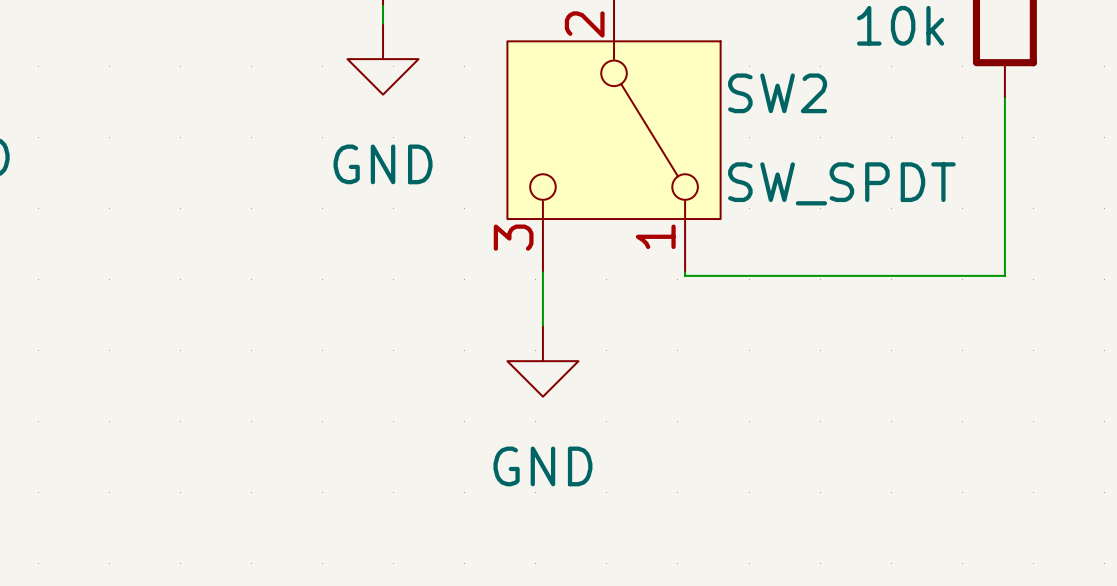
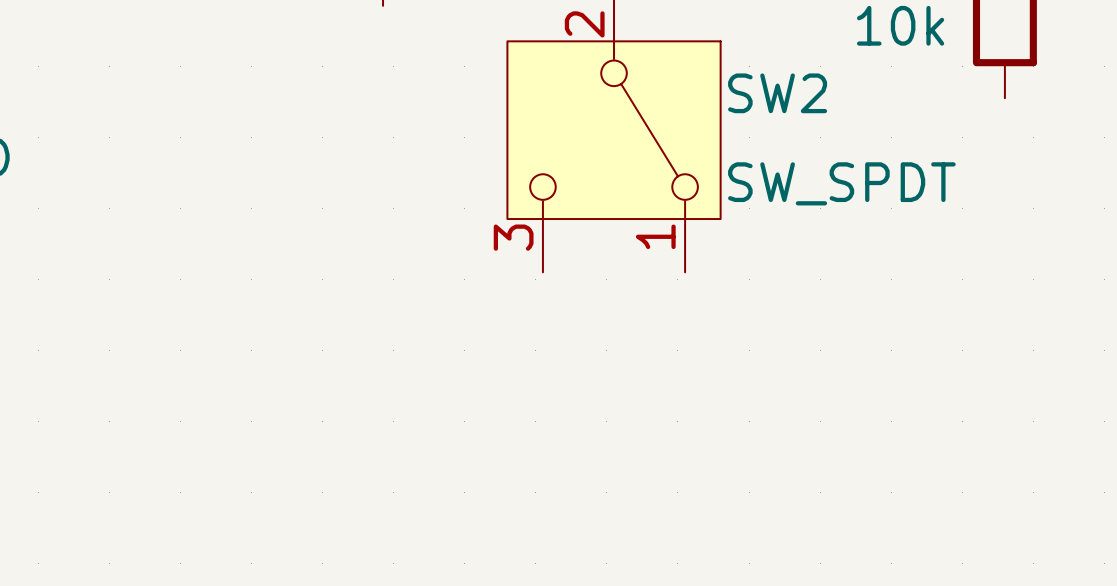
wire: (383, 5) (383, 23) -> none
power symbol: GND (383, 59) -> none
wire: (1004, 98) (1004, 275) (685, 275) (685, 272) -> none
wire: (542, 272) (542, 325) -> none
power symbol: GND (542, 361) -> none

